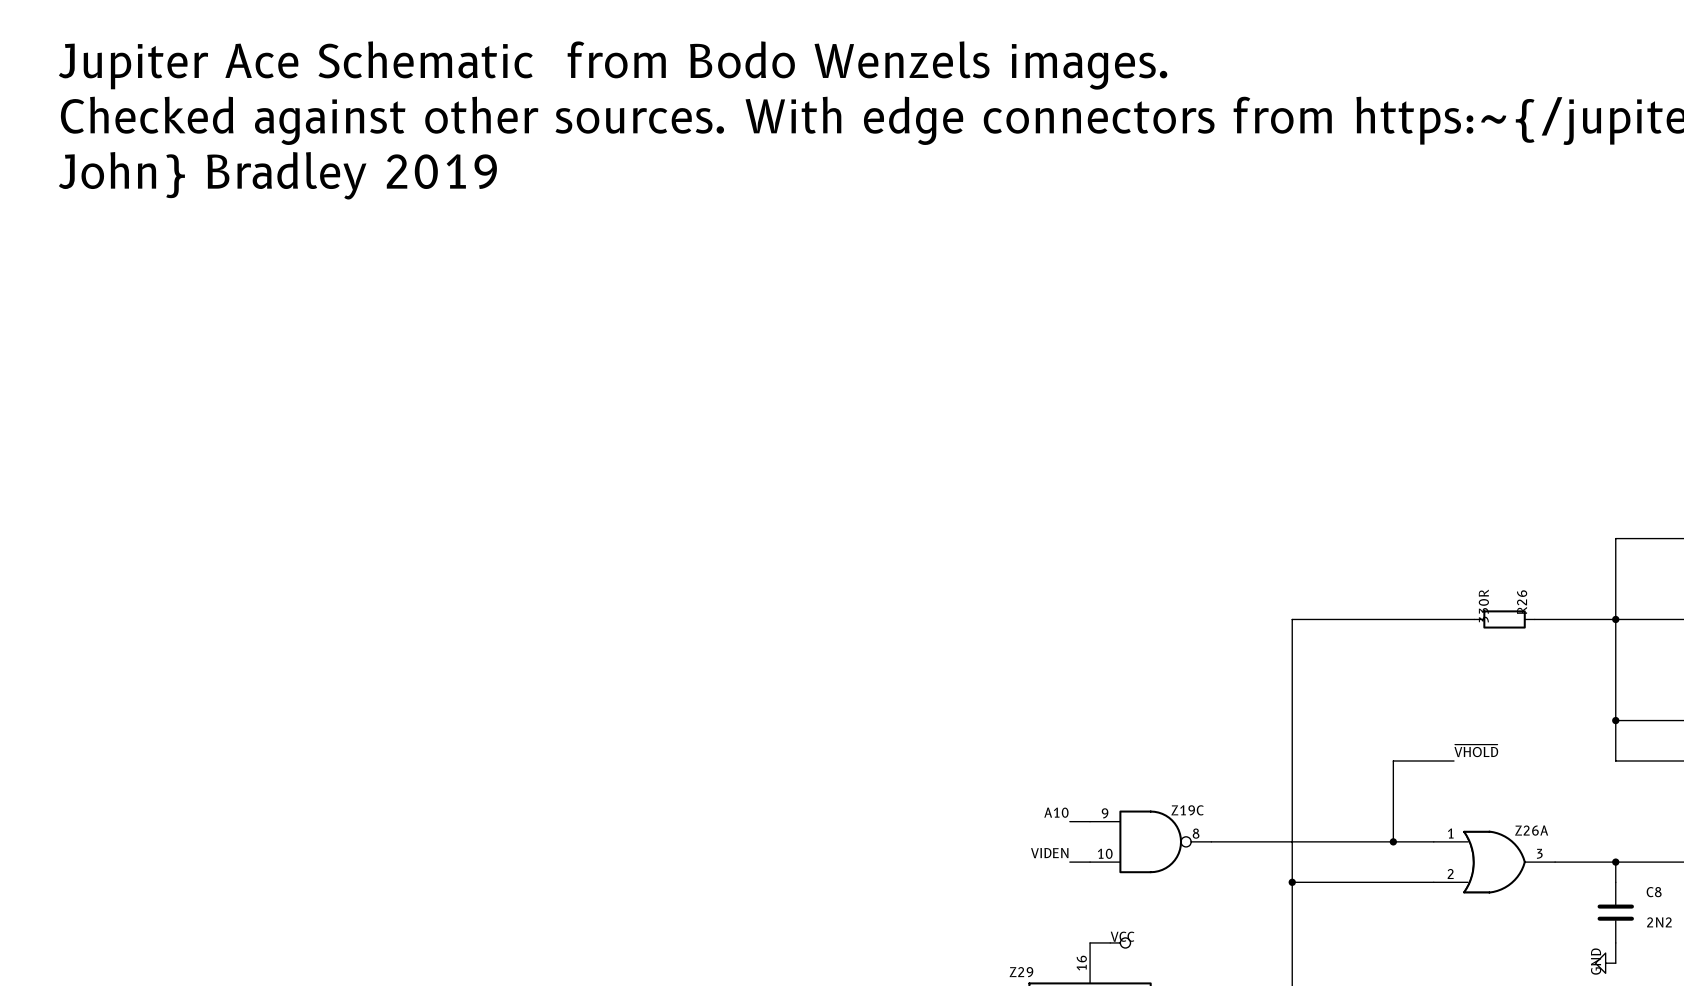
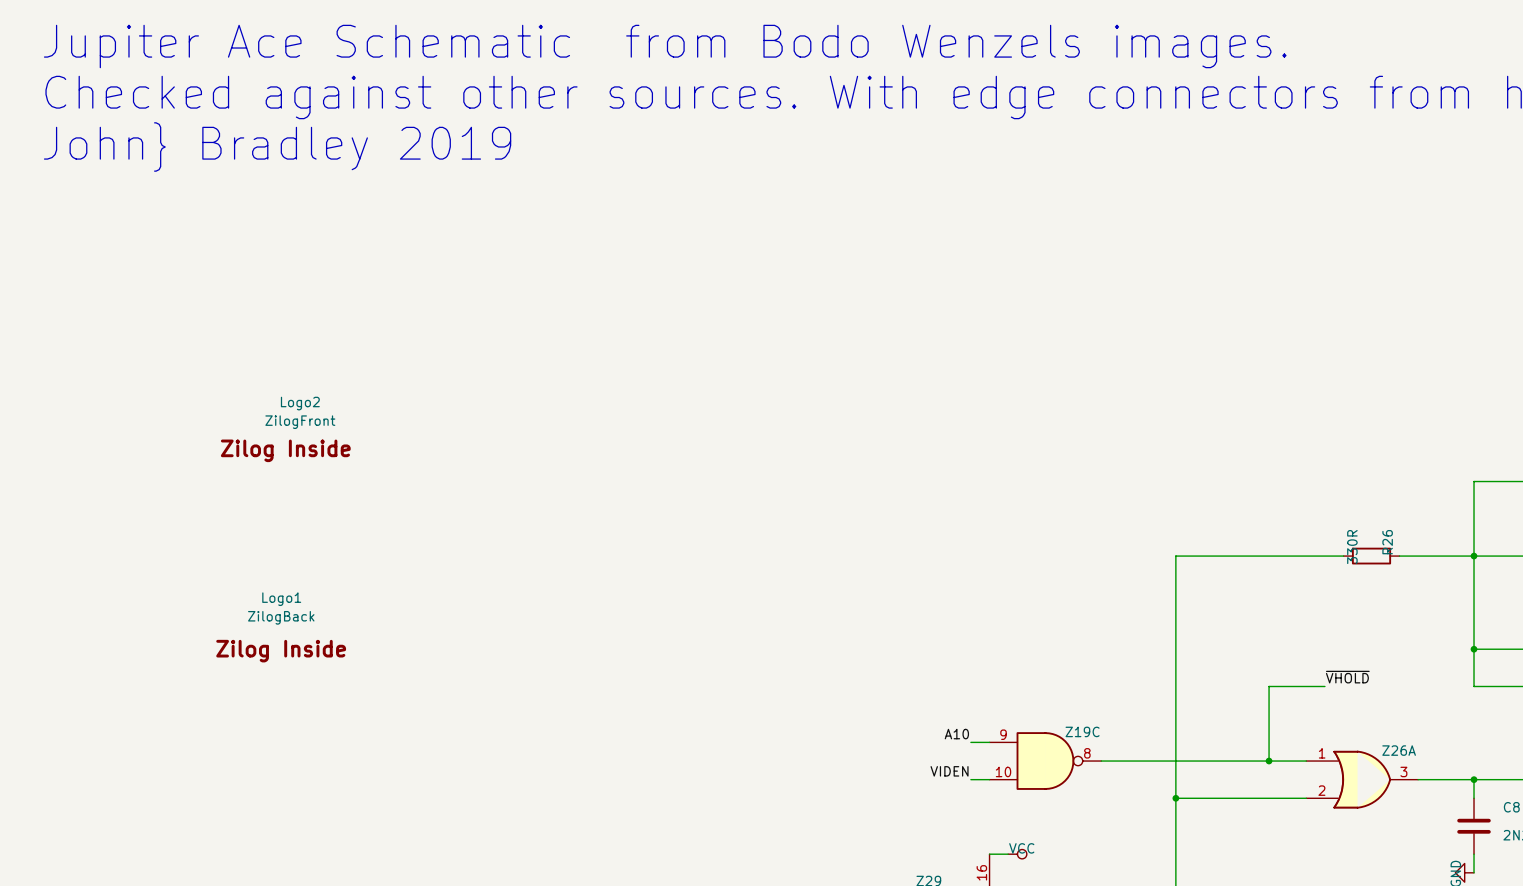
Logo2: none -> ZilogFront (285, 429)
Logo1: none -> ZilogBack (281, 627)

